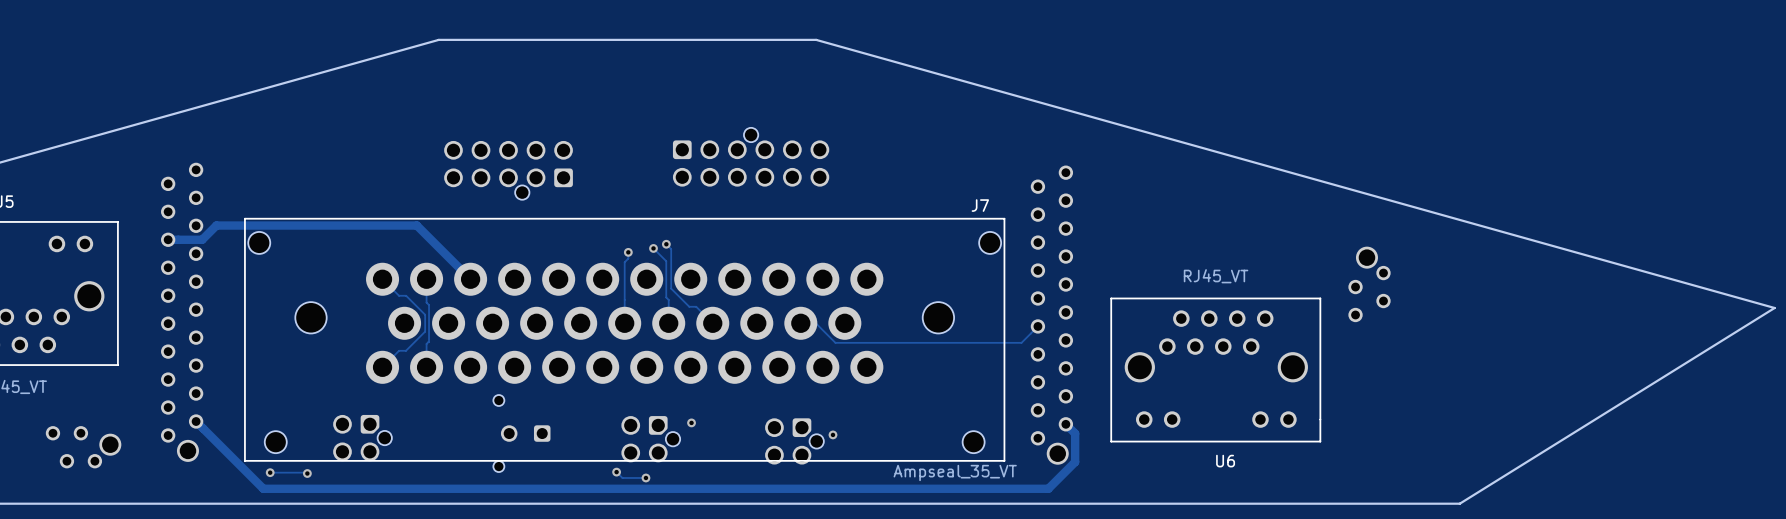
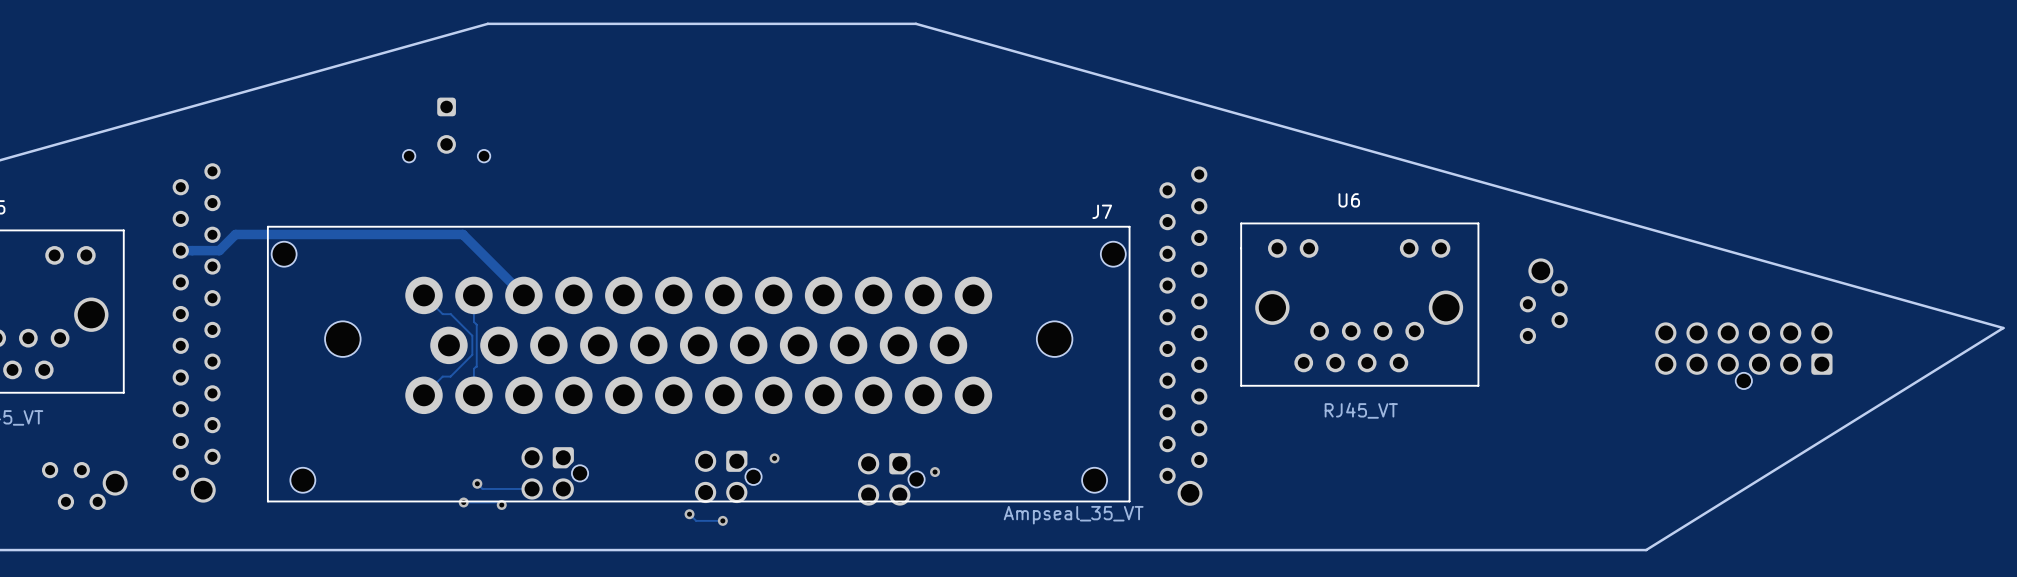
part: none -> (446, 129)
part: (751, 157) -> none
part: (508, 170) -> none
track: (666, 244) (671, 249) (671, 288) (689, 306) (696, 306) (712, 323) -> none
via: (666, 244) -> none
track: (653, 248) (666, 261) (668, 323) -> none
via: (653, 248) -> none
track: (628, 252) (628, 258) (624, 262) (624, 323) -> none
via: (628, 252) -> none
track: (800, 323) (815, 323) (835, 342) (1021, 342) (1037, 326) -> none
part: none -> (1743, 355)
U6 rotation: 0° (1215, 370) -> 180° (1359, 304)
track: (196, 421) (263, 488) (1048, 488) (1075, 462) (1075, 433) (1065, 424) -> none
part: (521, 433) -> none
part position: (362, 438) -> (554, 473)
track: none -> (477, 483) (482, 488) (532, 488)
via: none -> (477, 483)
track: none -> (463, 502) (499, 502) (501, 504)
via: none -> (463, 502)
via: none -> (501, 504)
track: (270, 472) (307, 473) -> none
via: (270, 472) -> none
via: (307, 473) -> none

